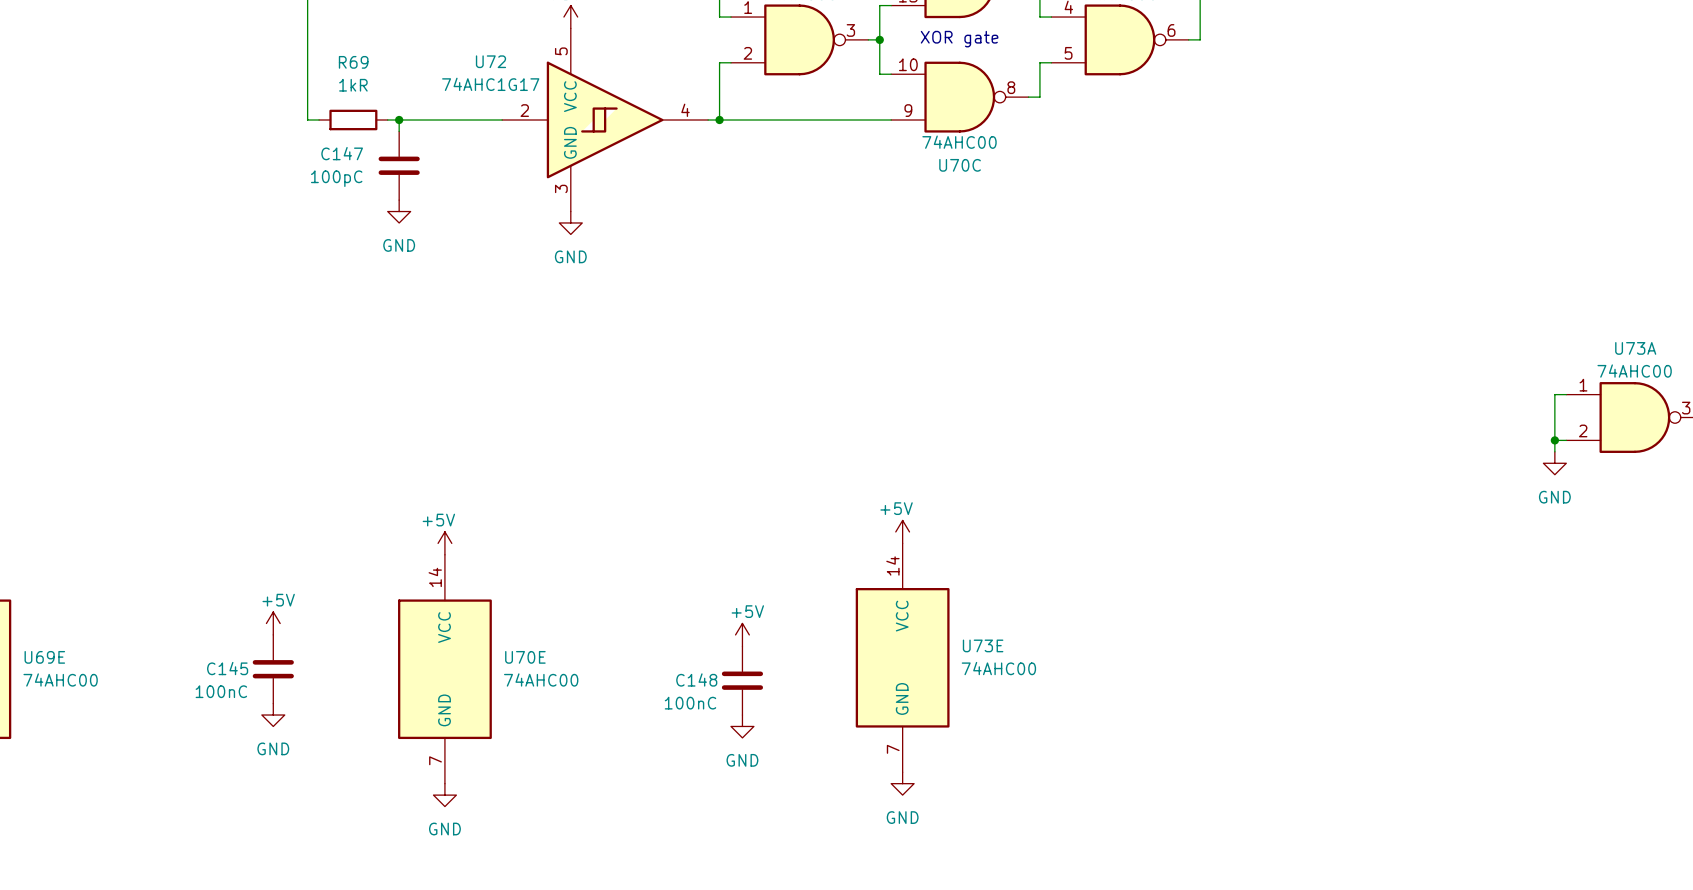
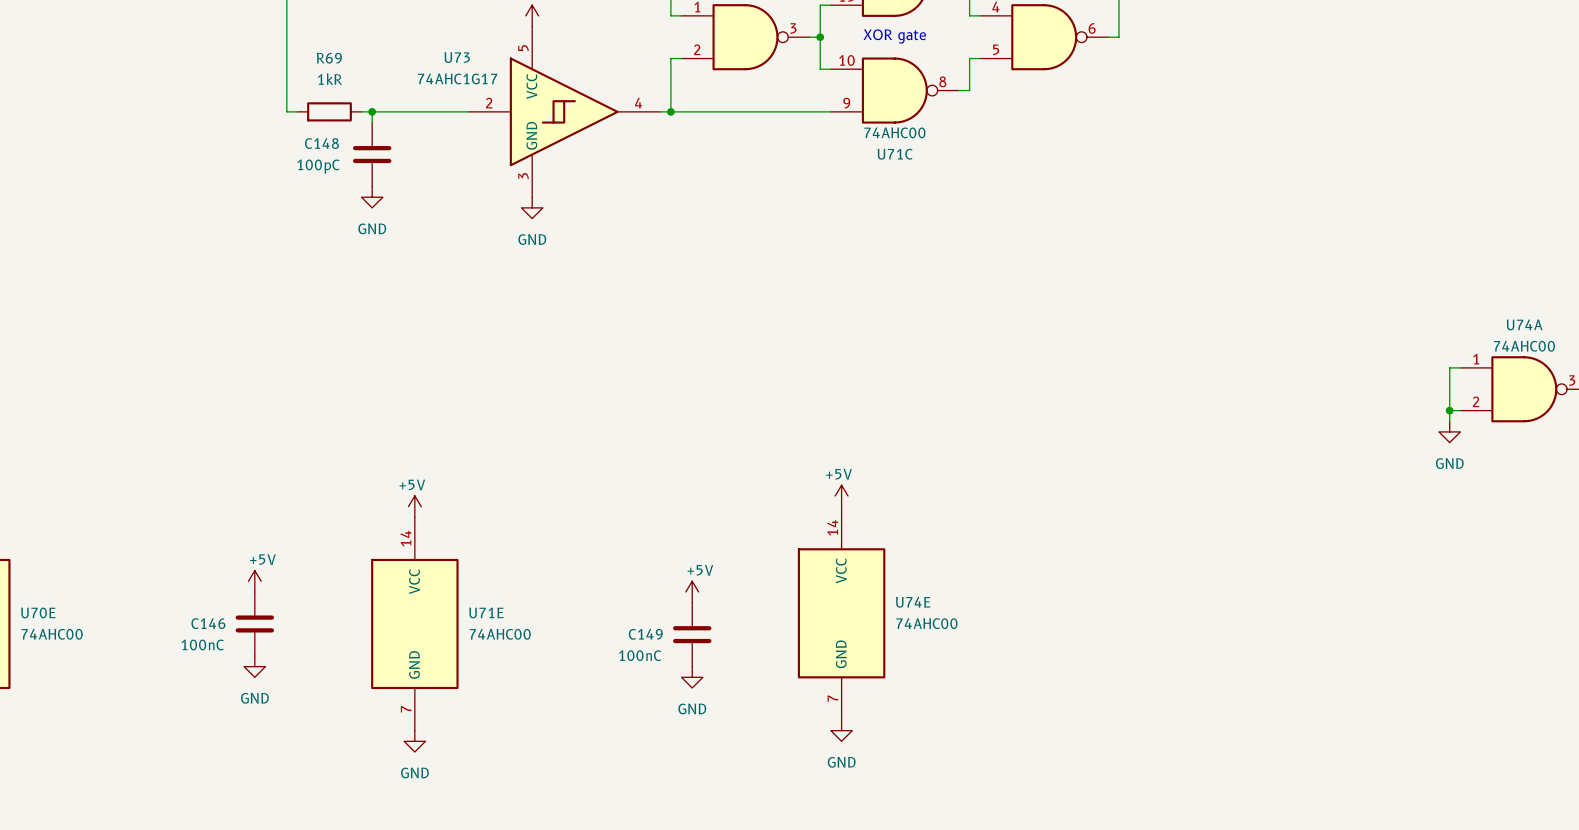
U72 name: U72 (490, 61) -> U73 (457, 57)
C147 name: C147 (342, 153) -> C148 (321, 143)
U70C name: U70C (960, 165) -> U71C (895, 154)
U73A name: U73A (1635, 348) -> U74A (1524, 324)
U73E name: U73E (983, 645) -> U74E (913, 602)
U69E name: U69E (44, 657) -> U70E (38, 612)
U70E name: U70E (525, 657) -> U71E (486, 612)
C145 name: C145 (227, 668) -> C146 (208, 623)
C148 name: C148 (696, 679) -> C149 (645, 634)

